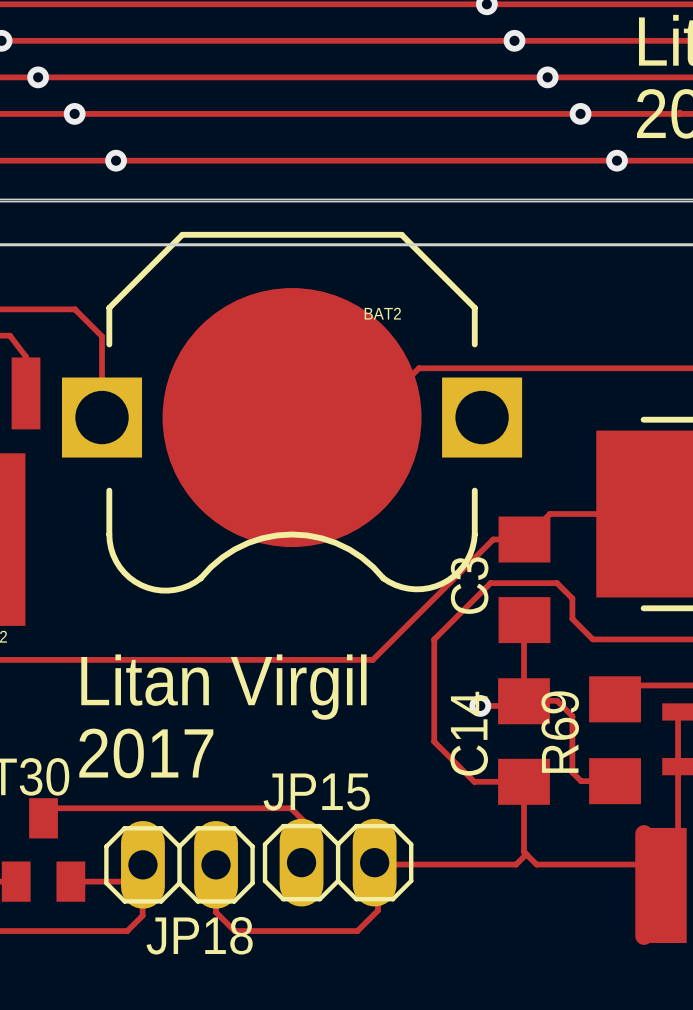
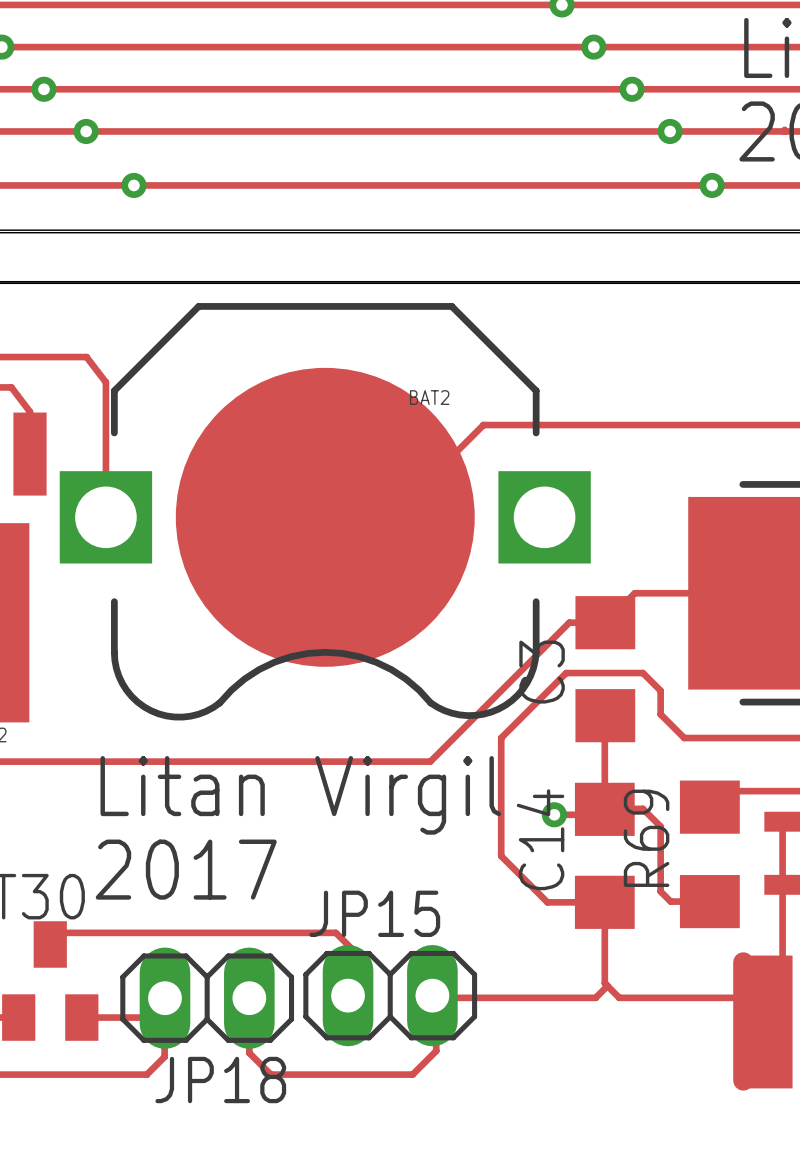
track: (74, 309) (102, 336) (102, 417) -> (86, 357) (105, 382) (105, 517)
BAT2 position: (292, 412) -> (325, 511)

